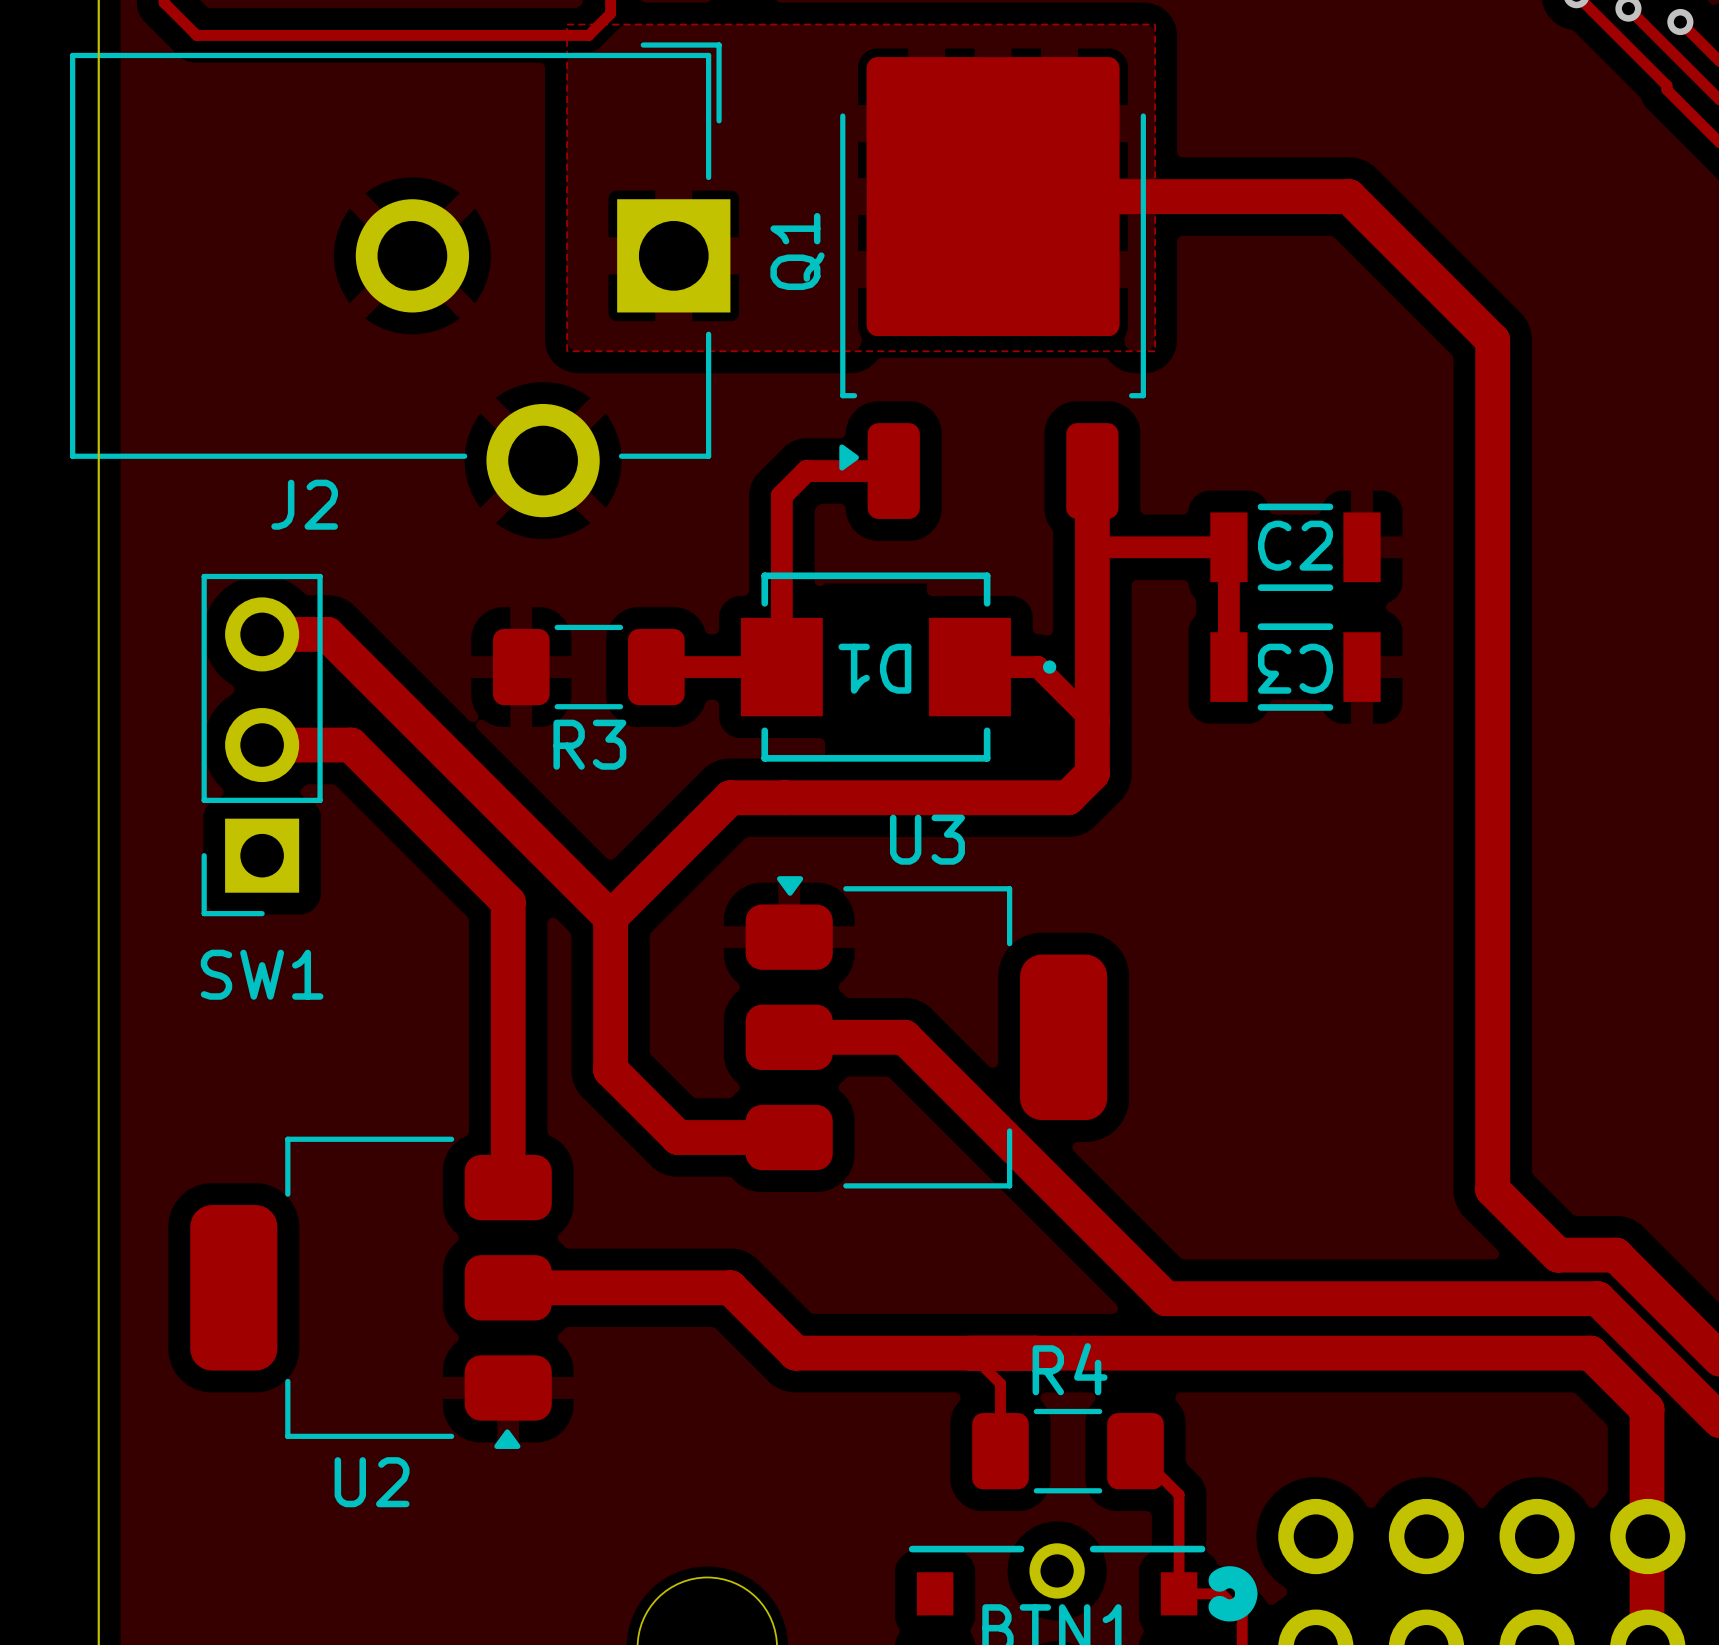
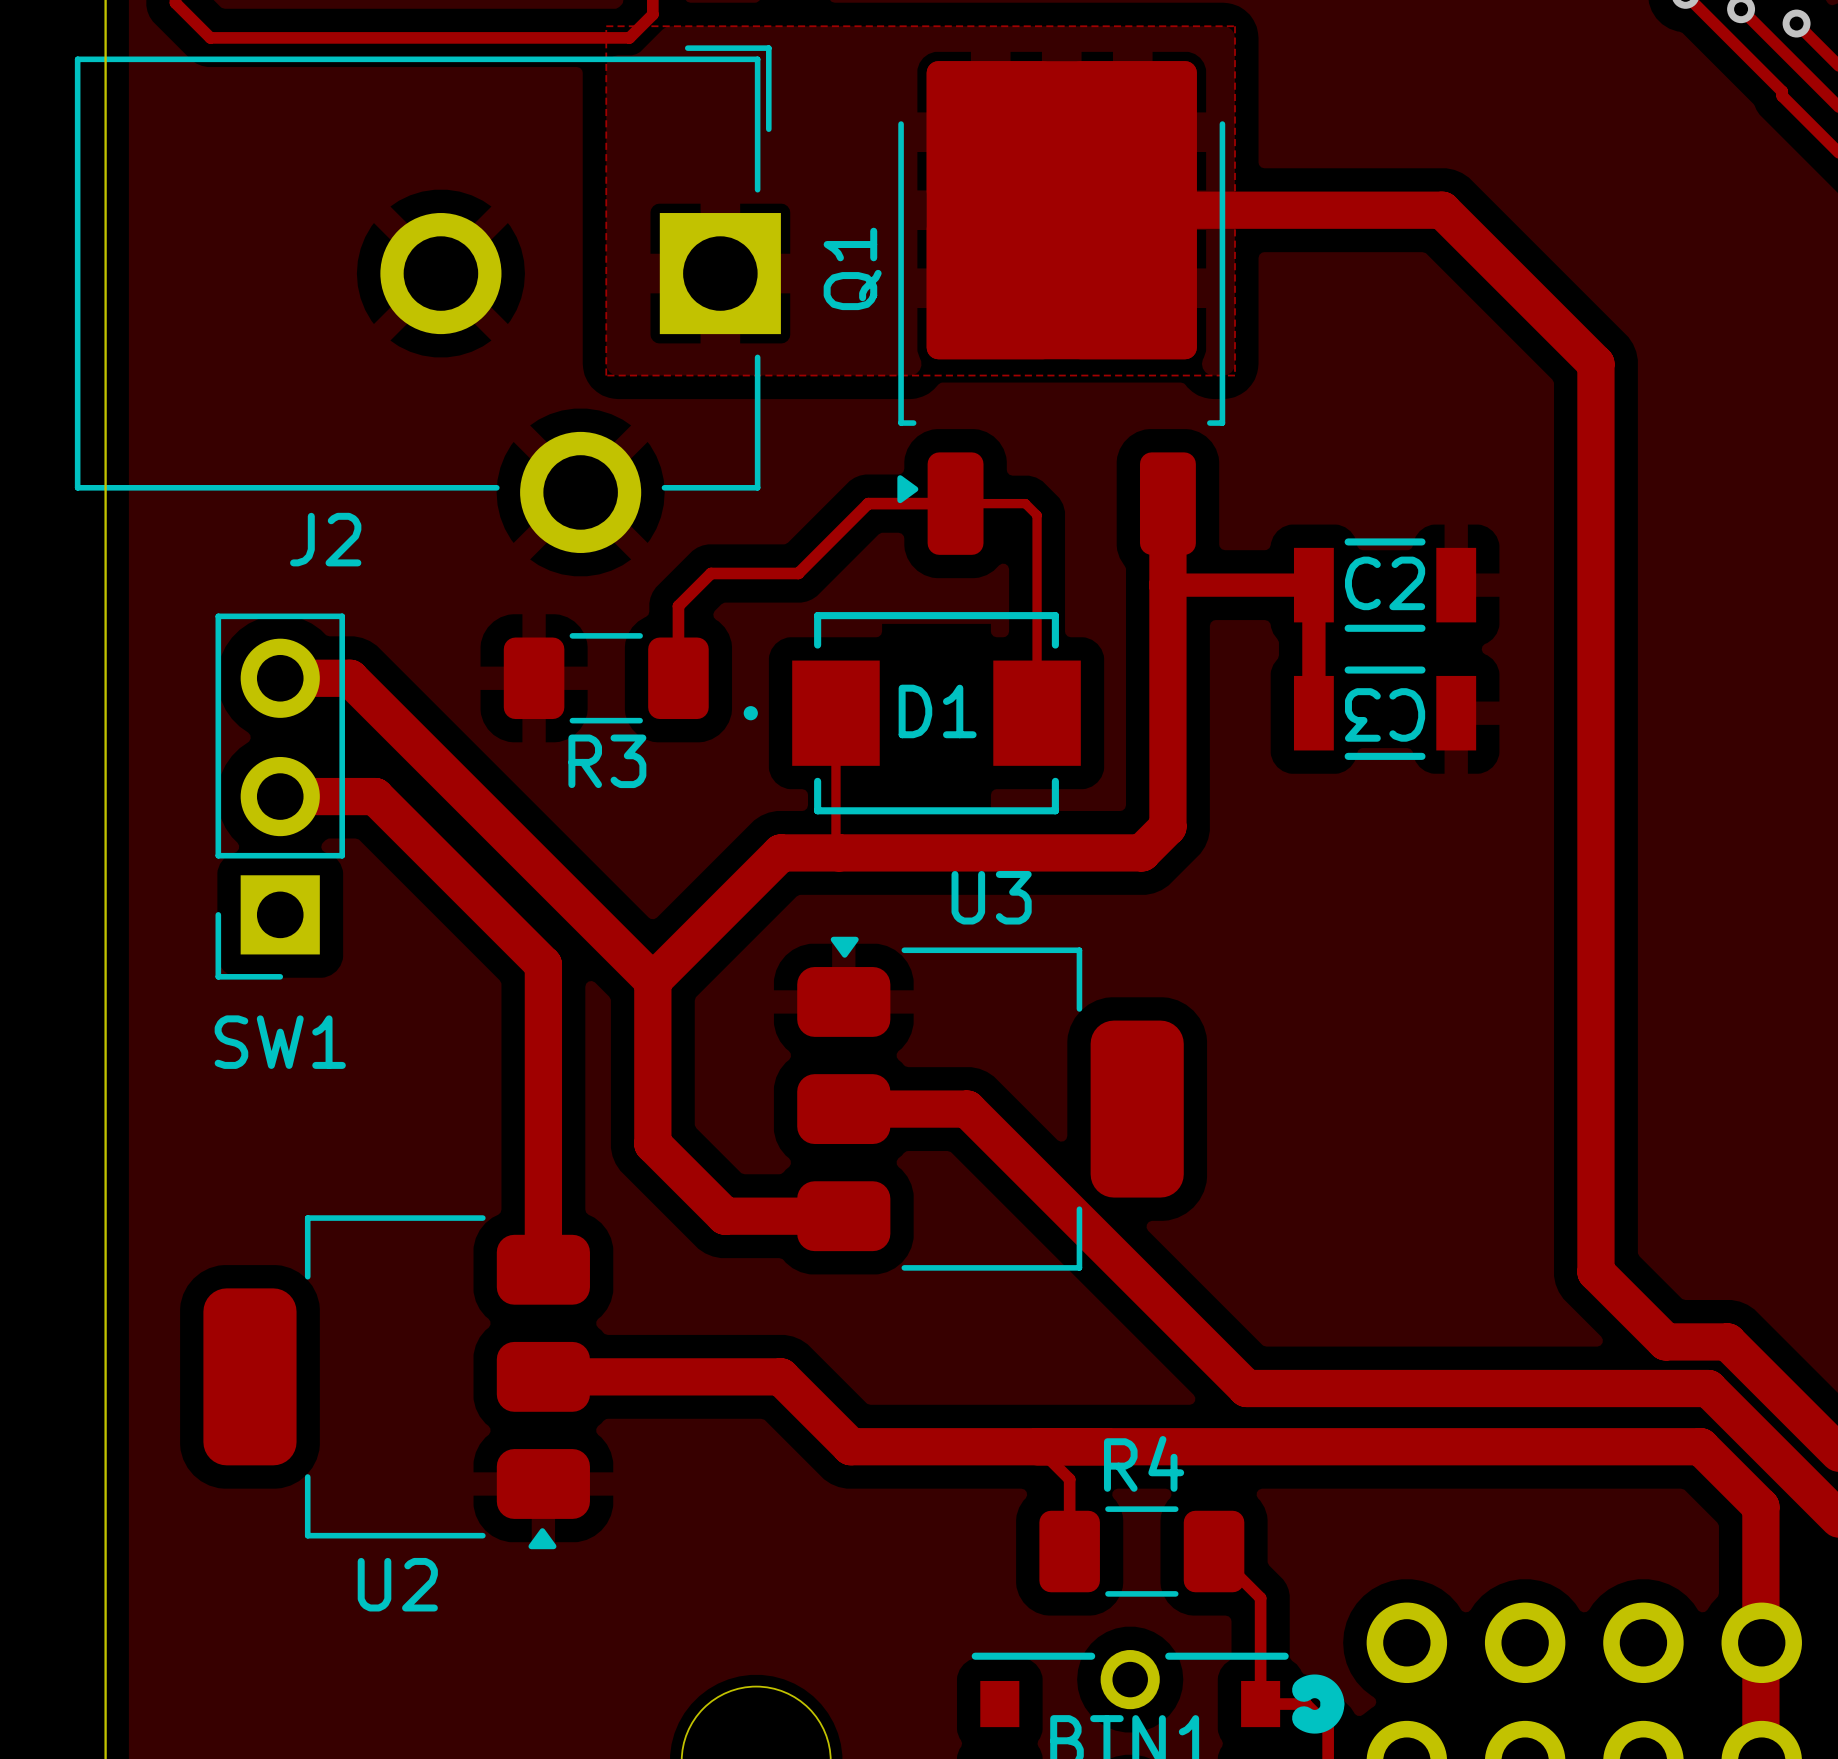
track: (812, 471) (806, 471) (781, 495) (781, 667) (656, 667) -> (868, 503) (798, 573) (711, 573) (678, 606) (678, 678)
track width: thick (812, 471) (893, 471) -> thin (868, 503) (955, 503)
R3 position: (588, 667) -> (606, 678)
track: none -> (835, 713) (835, 849)
D1 rotation: 0° (898, 667) -> 180° (912, 713)
track: (969, 667) (1037, 667) (1092, 721) -> (1037, 713) (1037, 515) (1025, 503) (955, 503)

